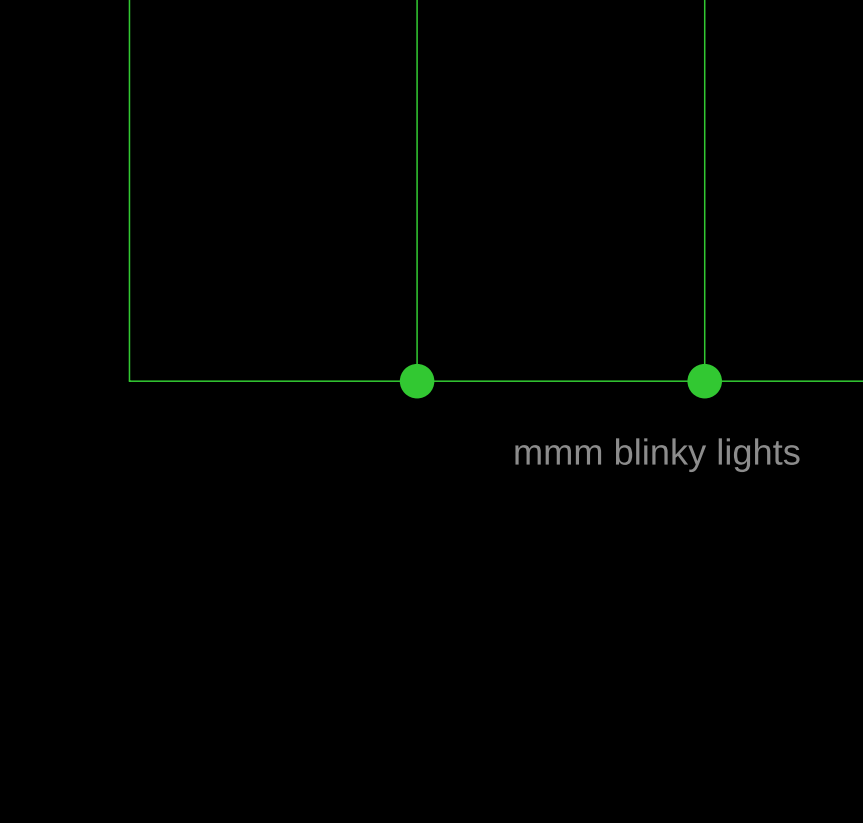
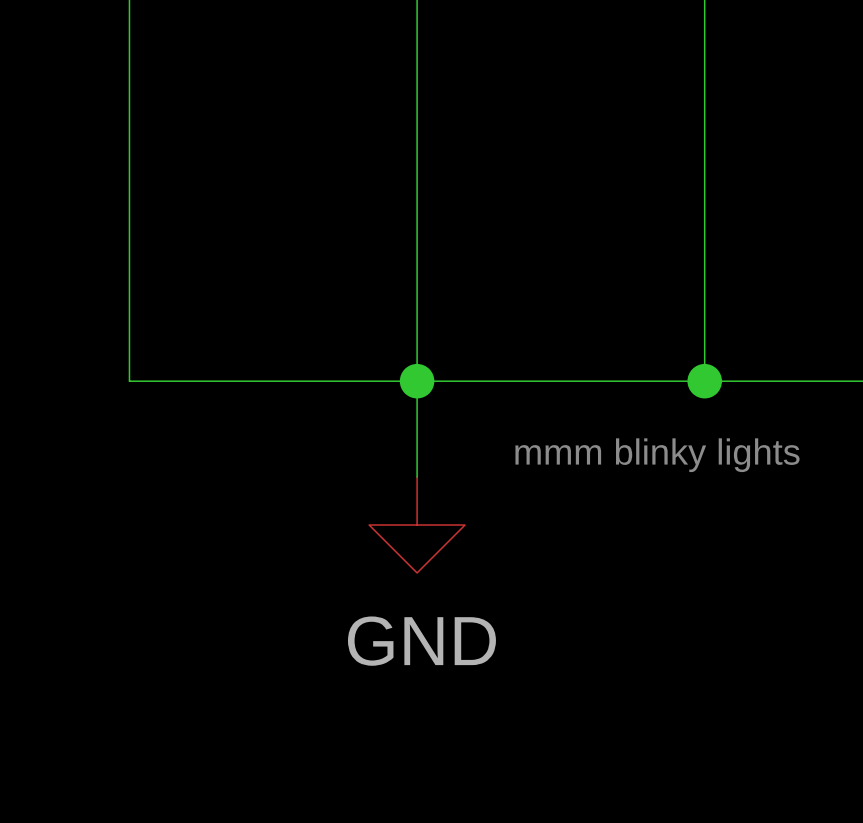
wire: none -> (417, 381) (417, 477)
power symbol: none -> GND (417, 525)

